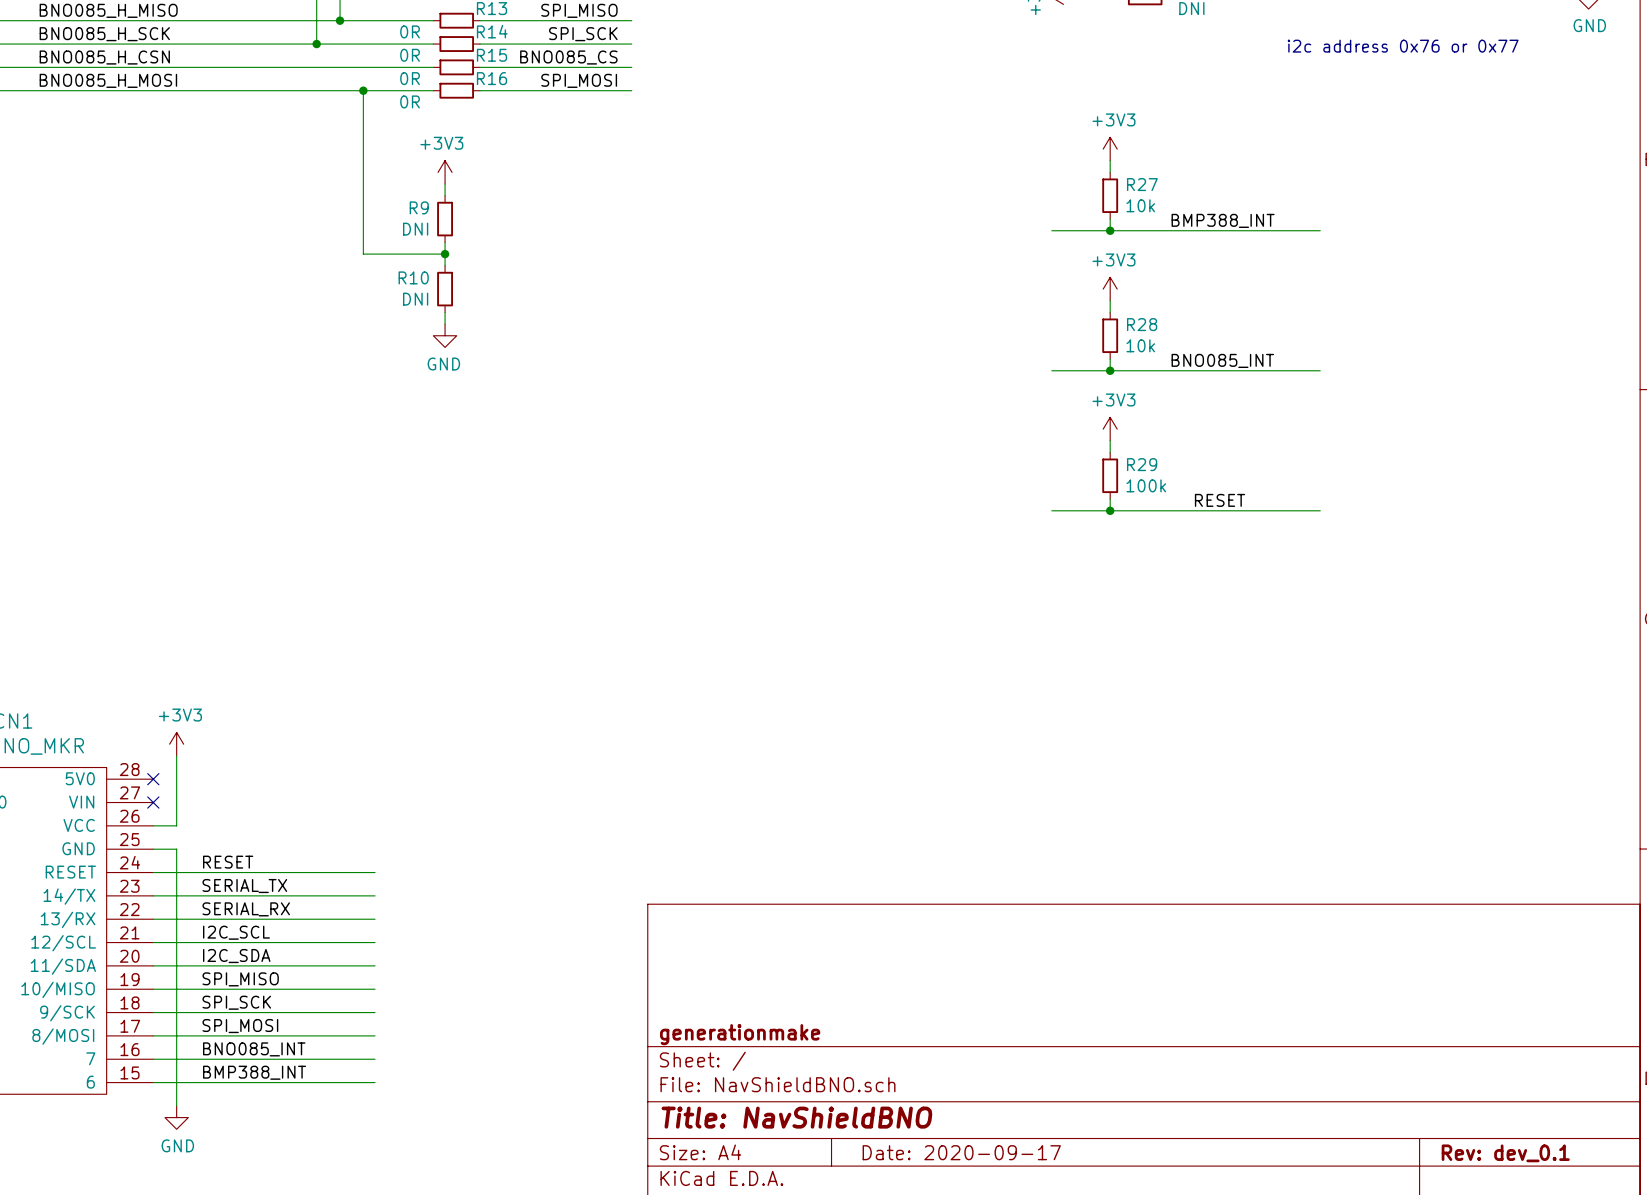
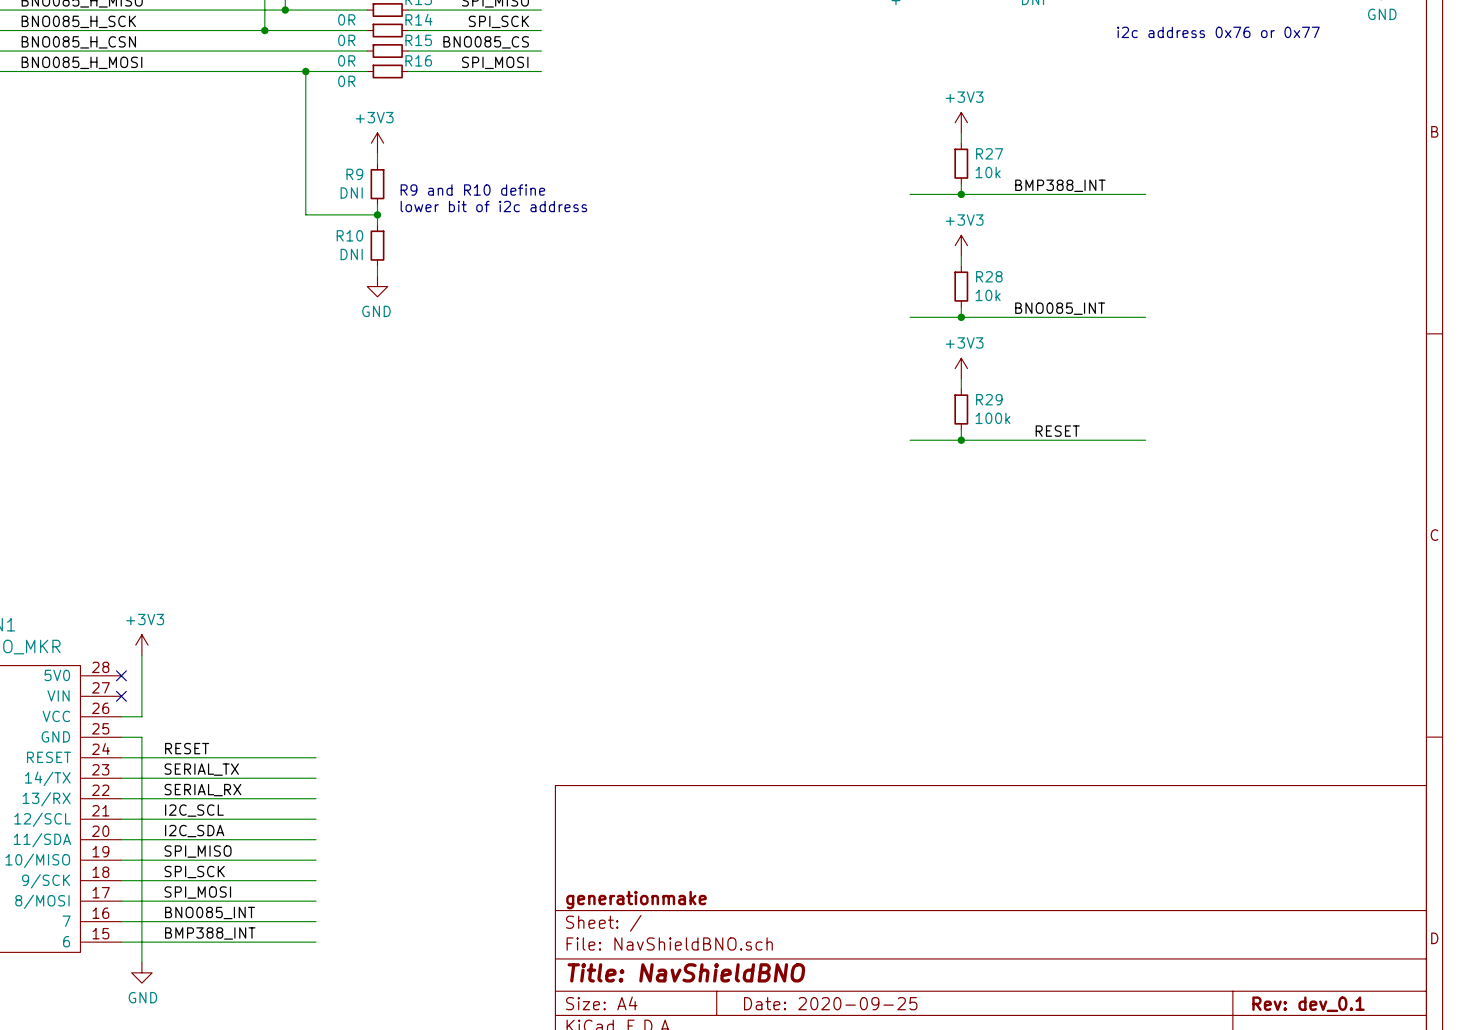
text: none -> R9 and R10 define (472, 190)
text: none -> lower bit of i2c address (493, 206)
title block: Date: 2020-09-17 (961, 1152) -> Date: 2020-09-25 (830, 1003)

